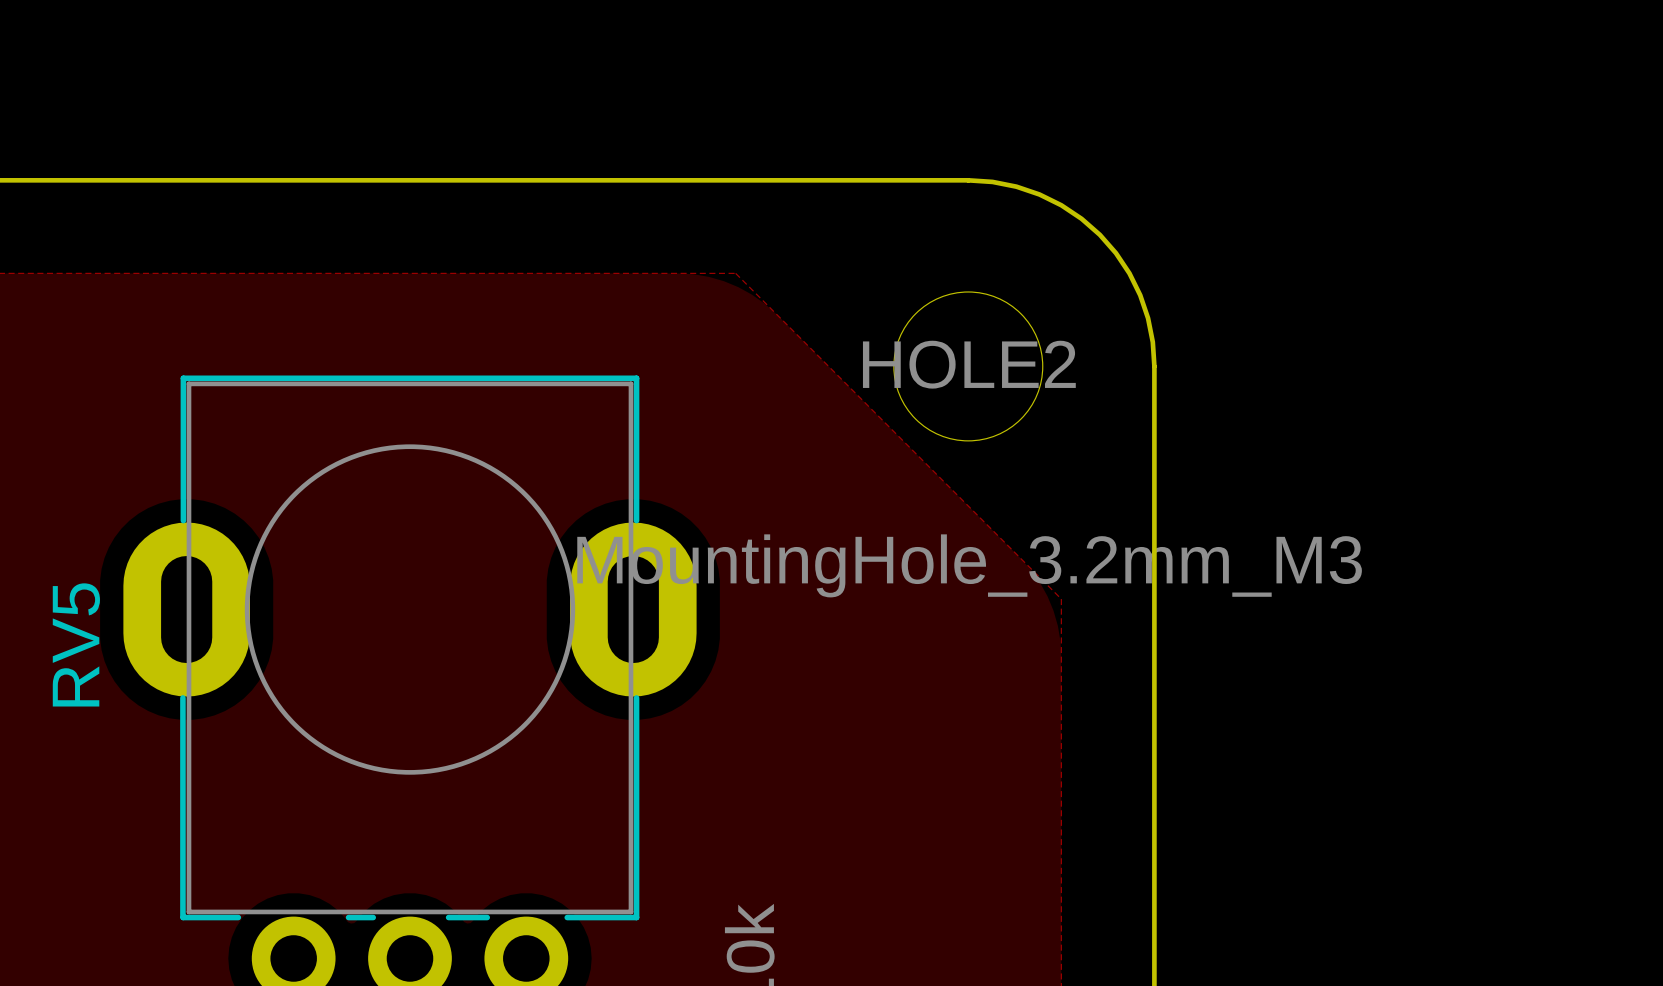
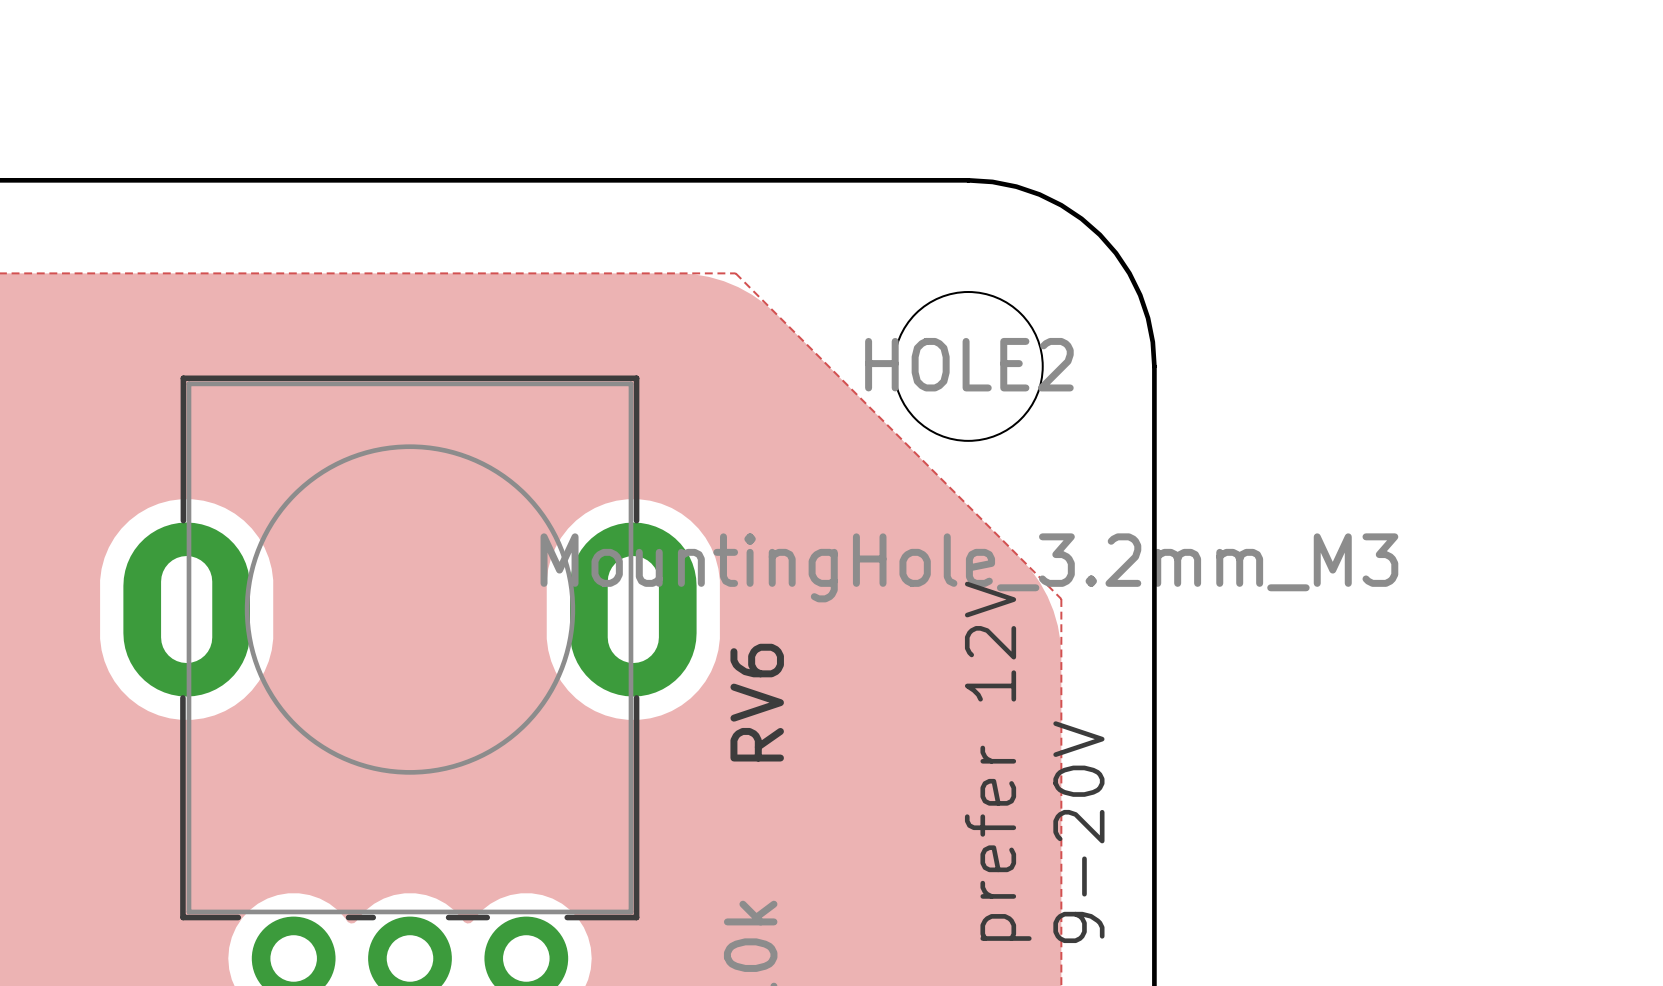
RV5 name: RV5 (76, 644) -> RV6 (757, 702)
text: none -> prefer 12V (998, 761)
text: none -> 9-20V (1078, 832)

